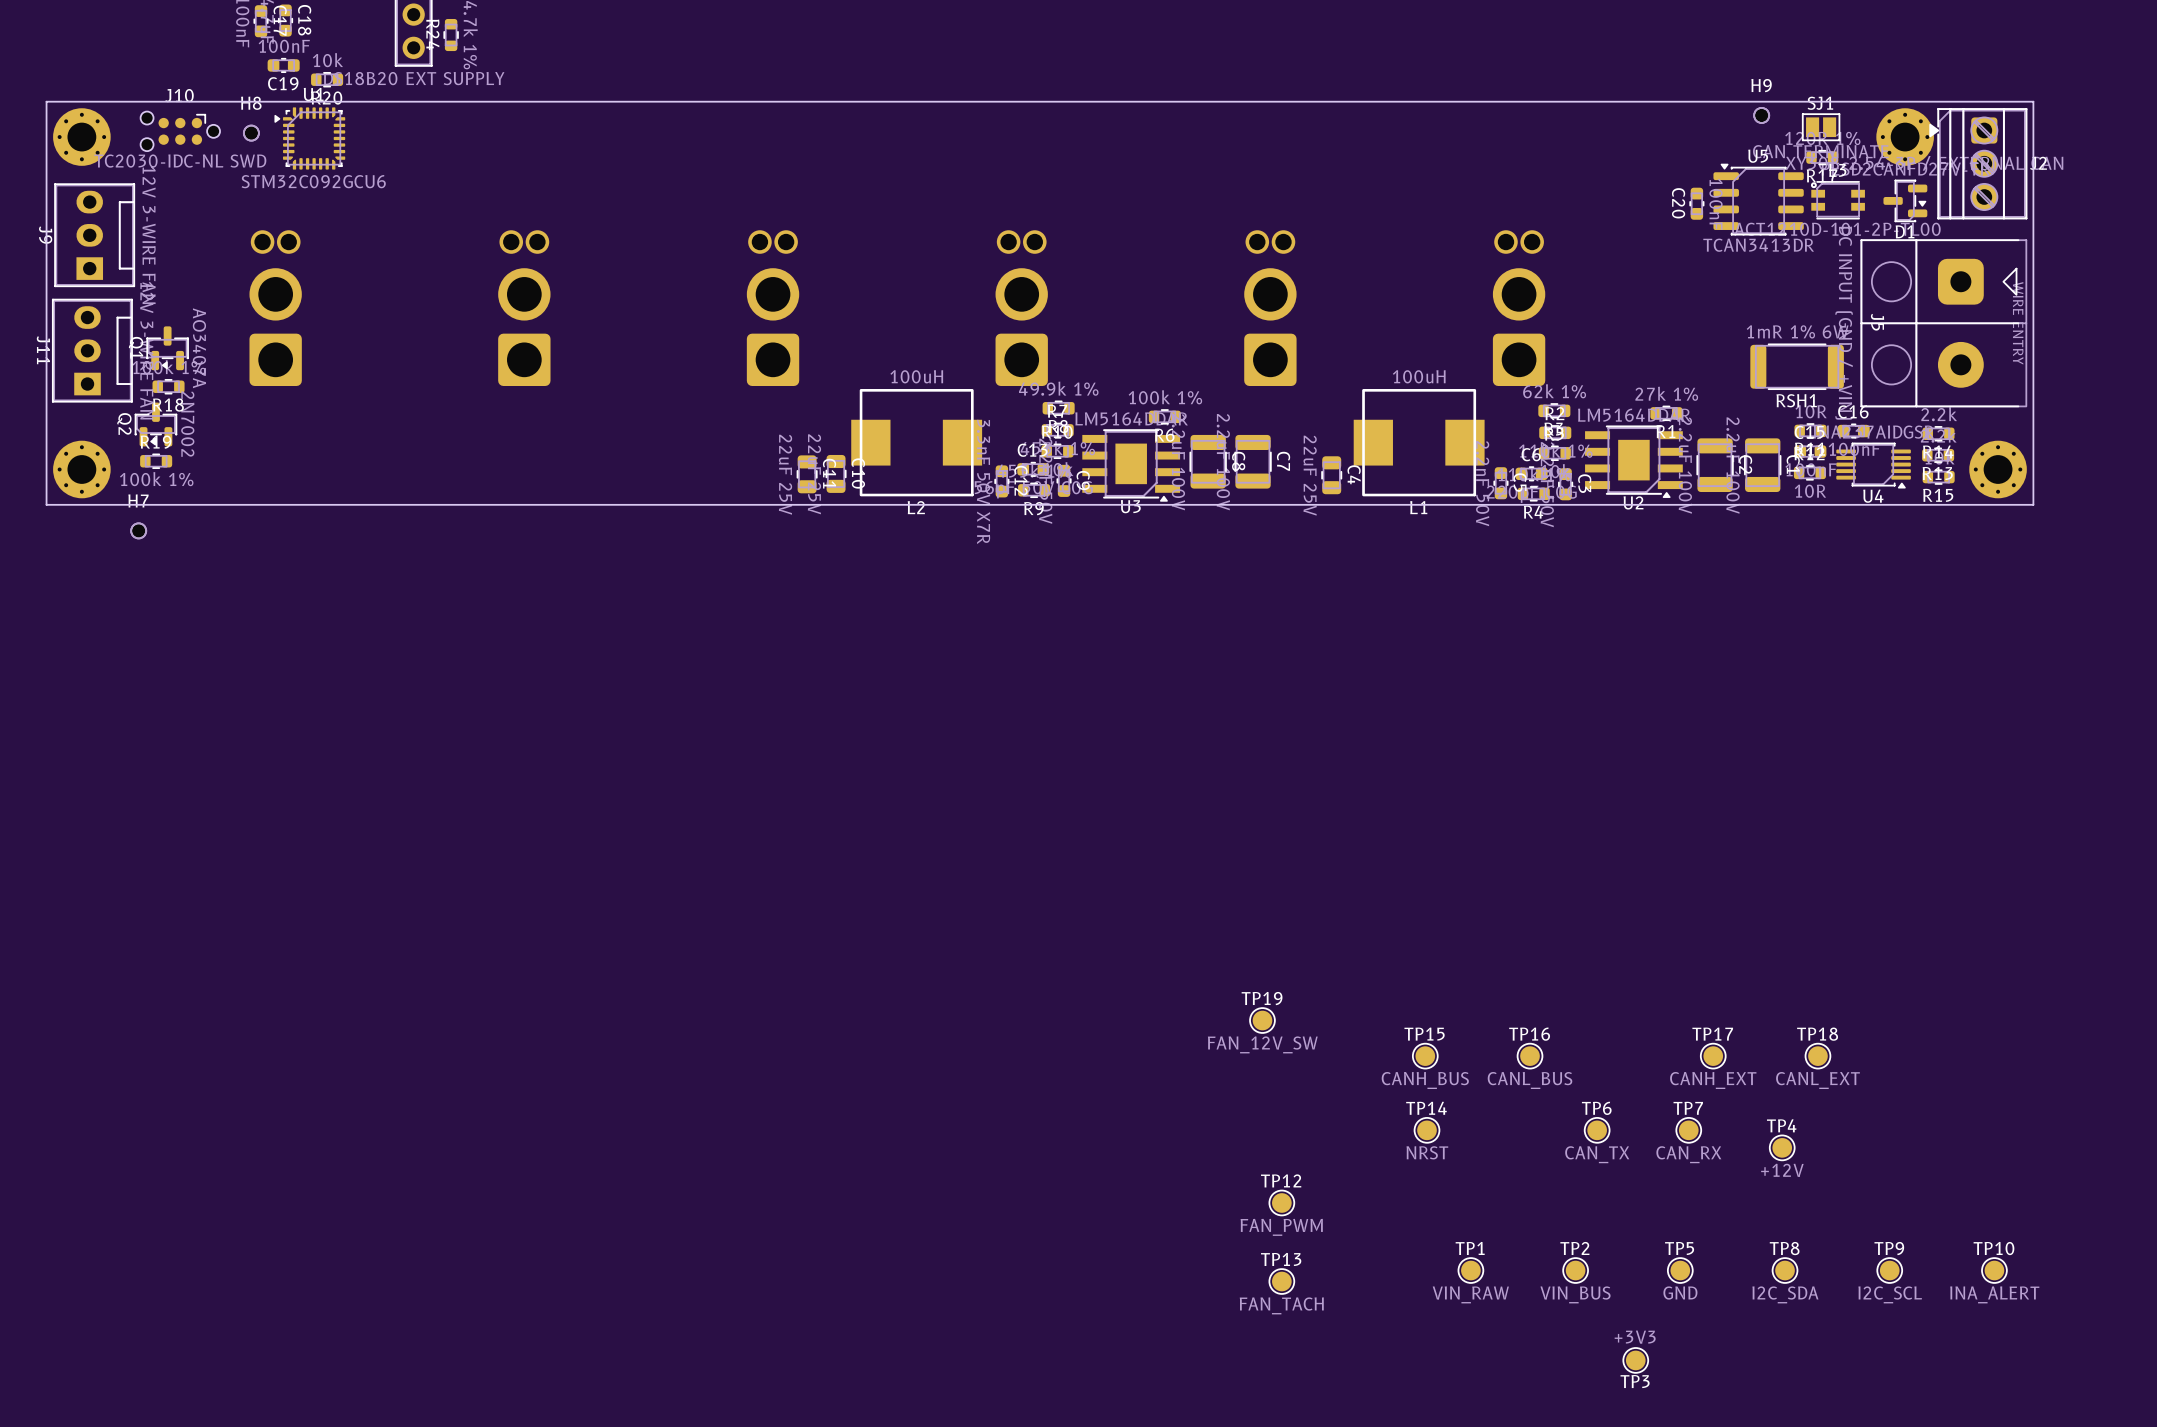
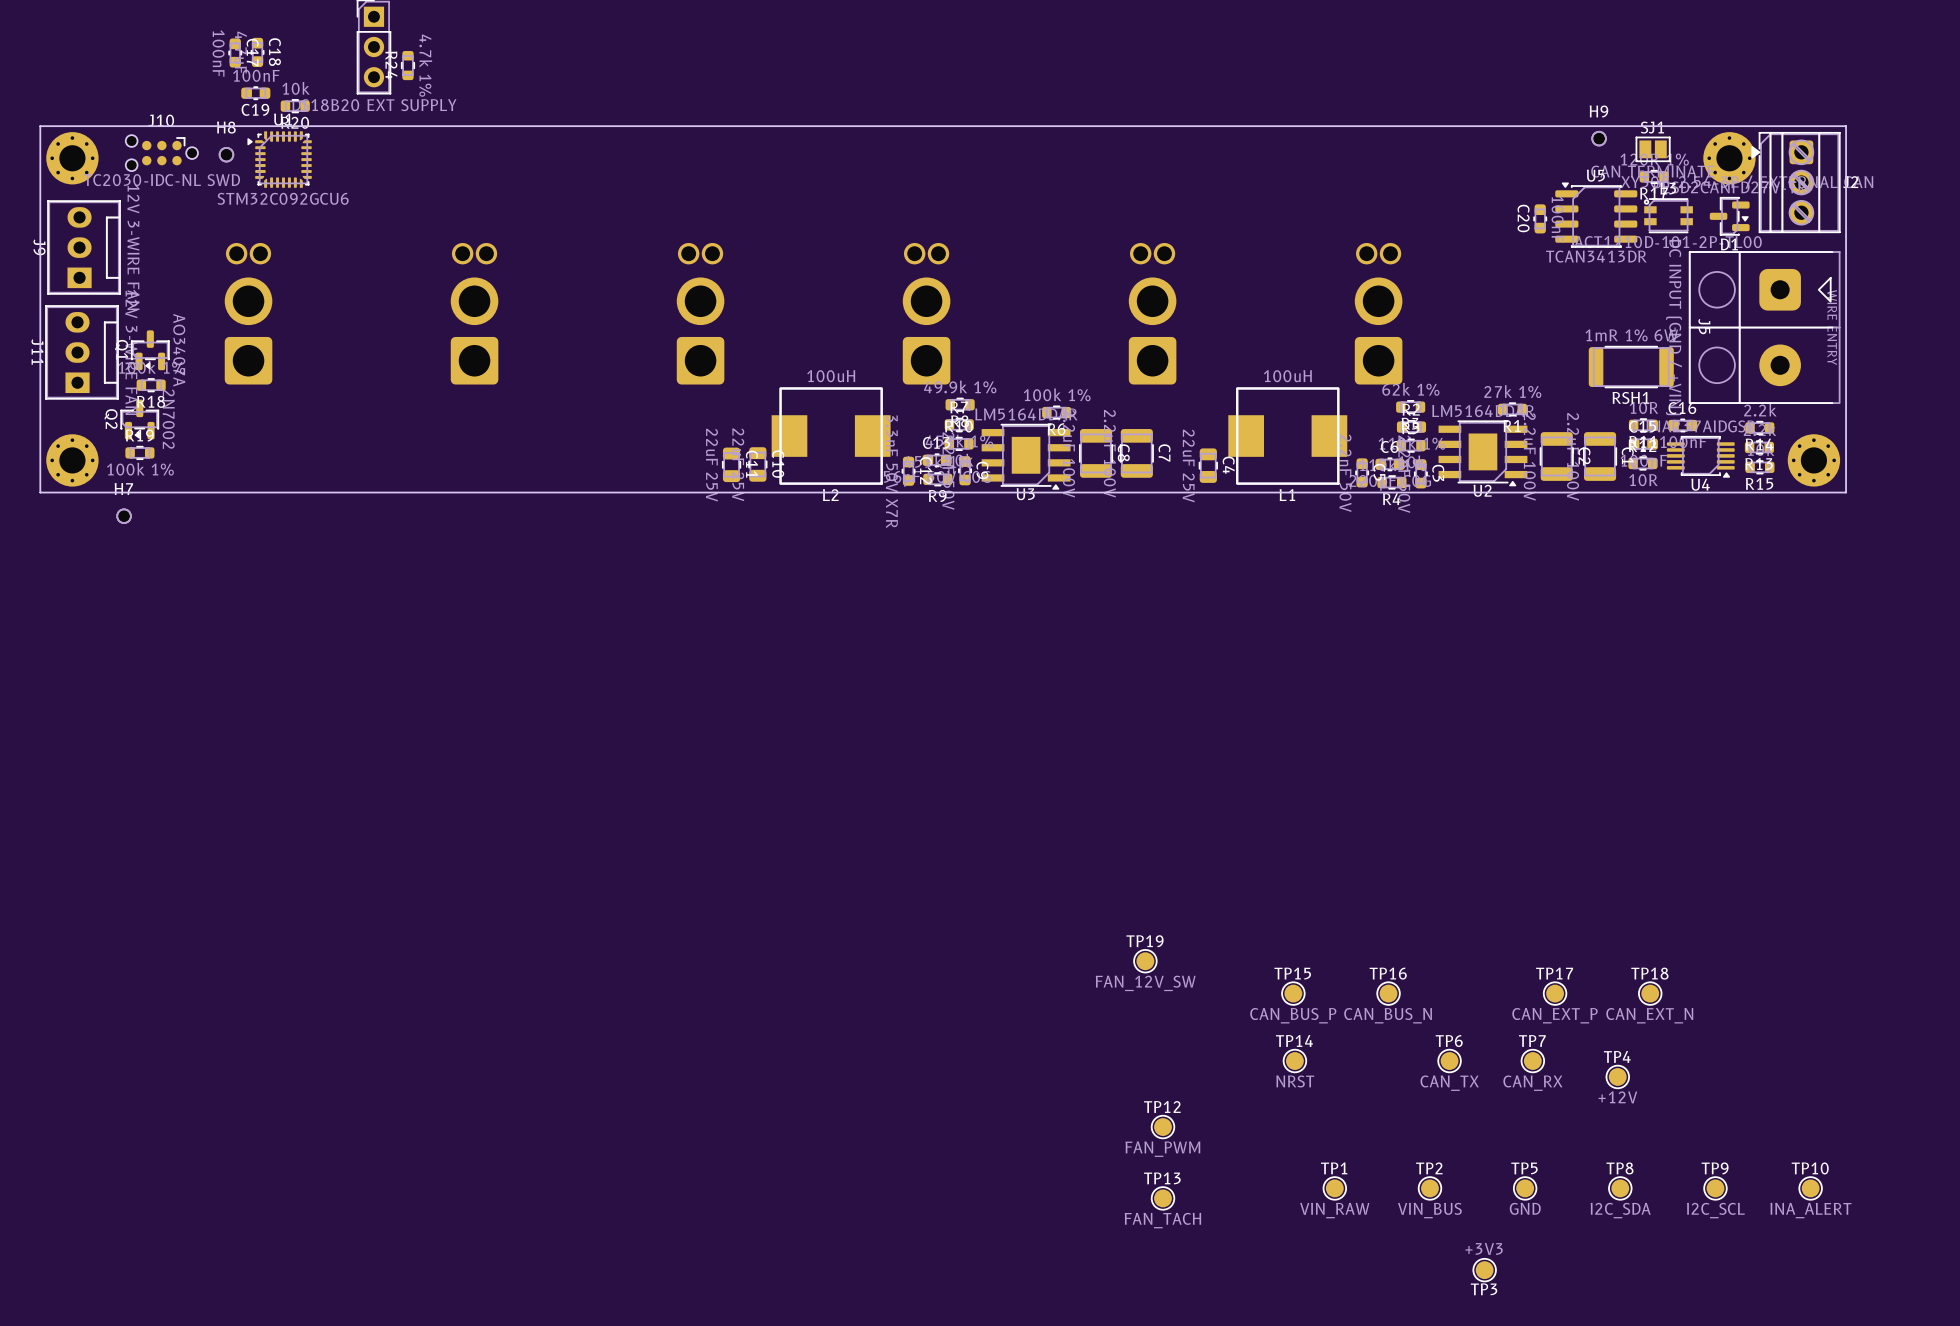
TP15 value: CANH_BUS (1425, 1080) -> CAN_BUS_P (1293, 1015)
TP16 value: CANL_BUS (1530, 1080) -> CAN_BUS_N (1388, 1015)
TP17 value: CANH_EXT (1713, 1080) -> CAN_EXT_P (1555, 1015)
TP18 value: CANL_EXT (1817, 1080) -> CAN_EXT_N (1649, 1015)

